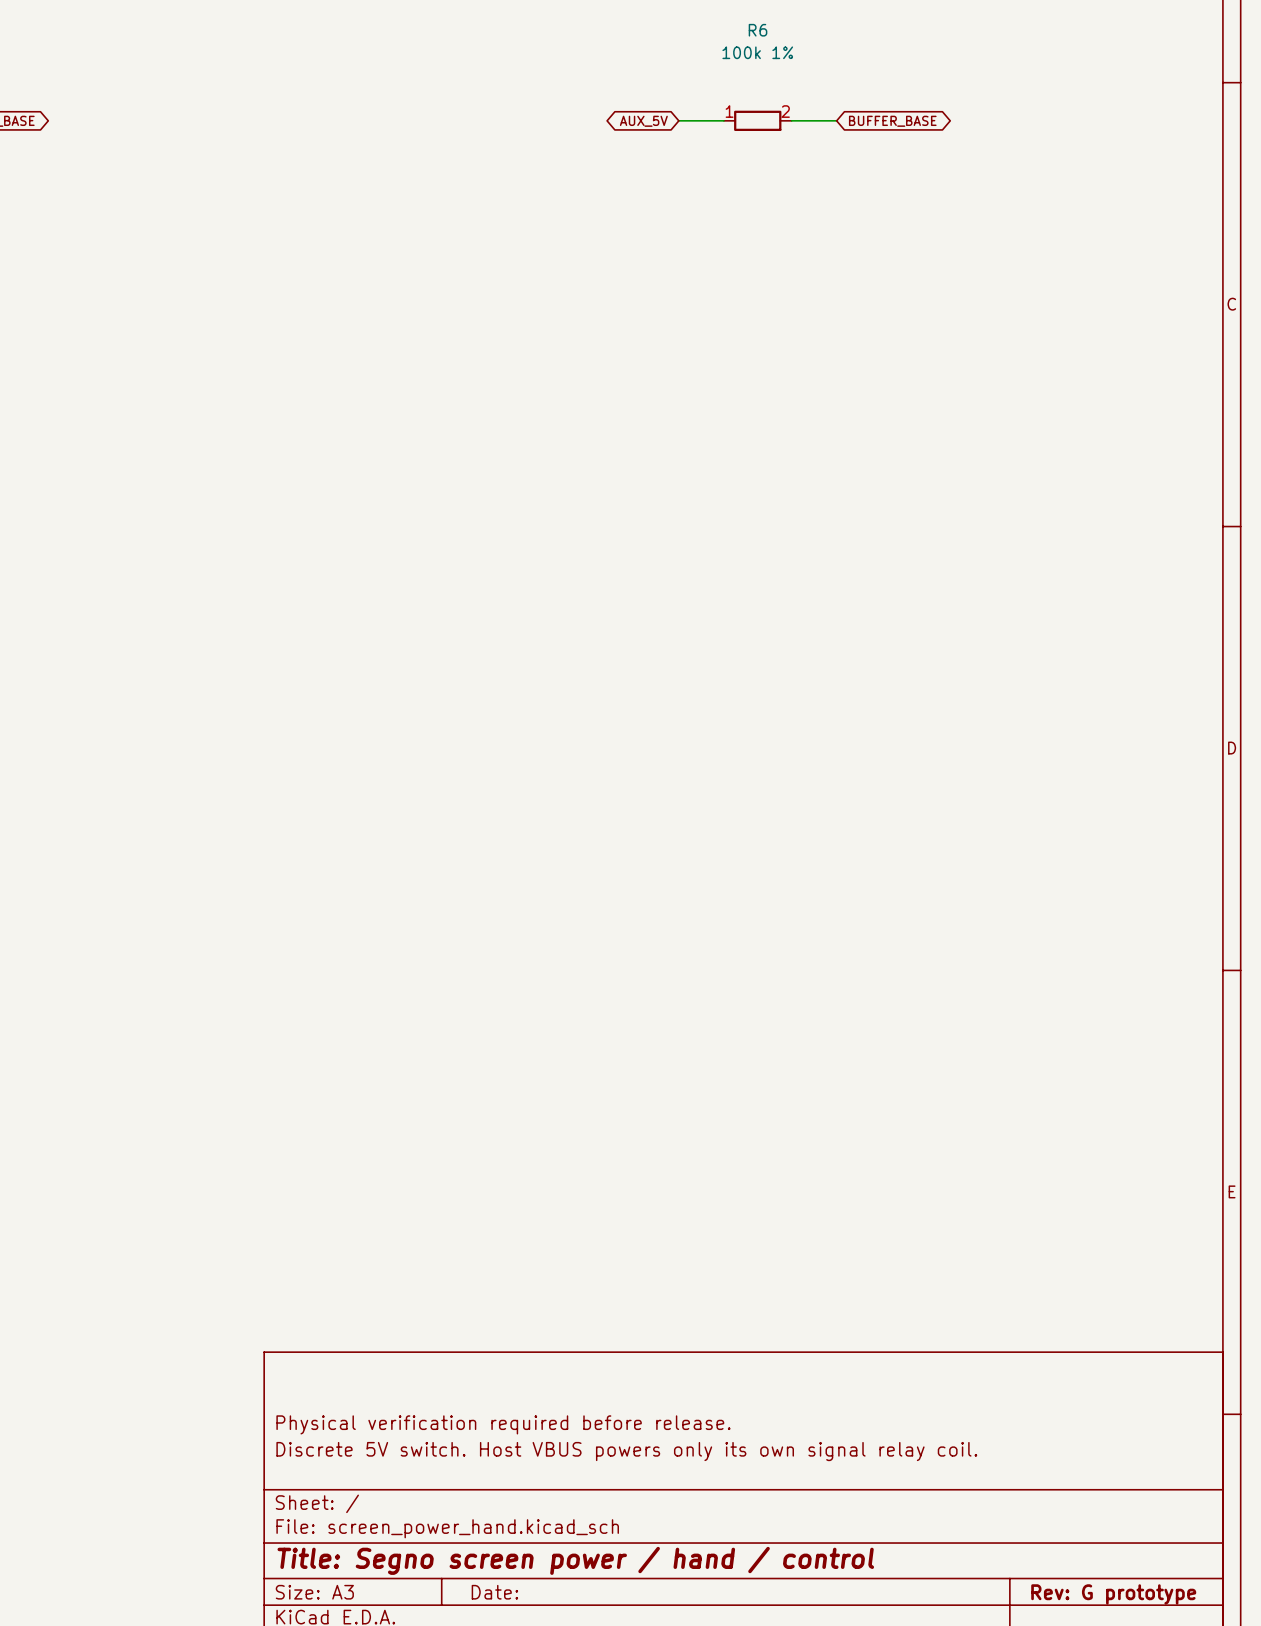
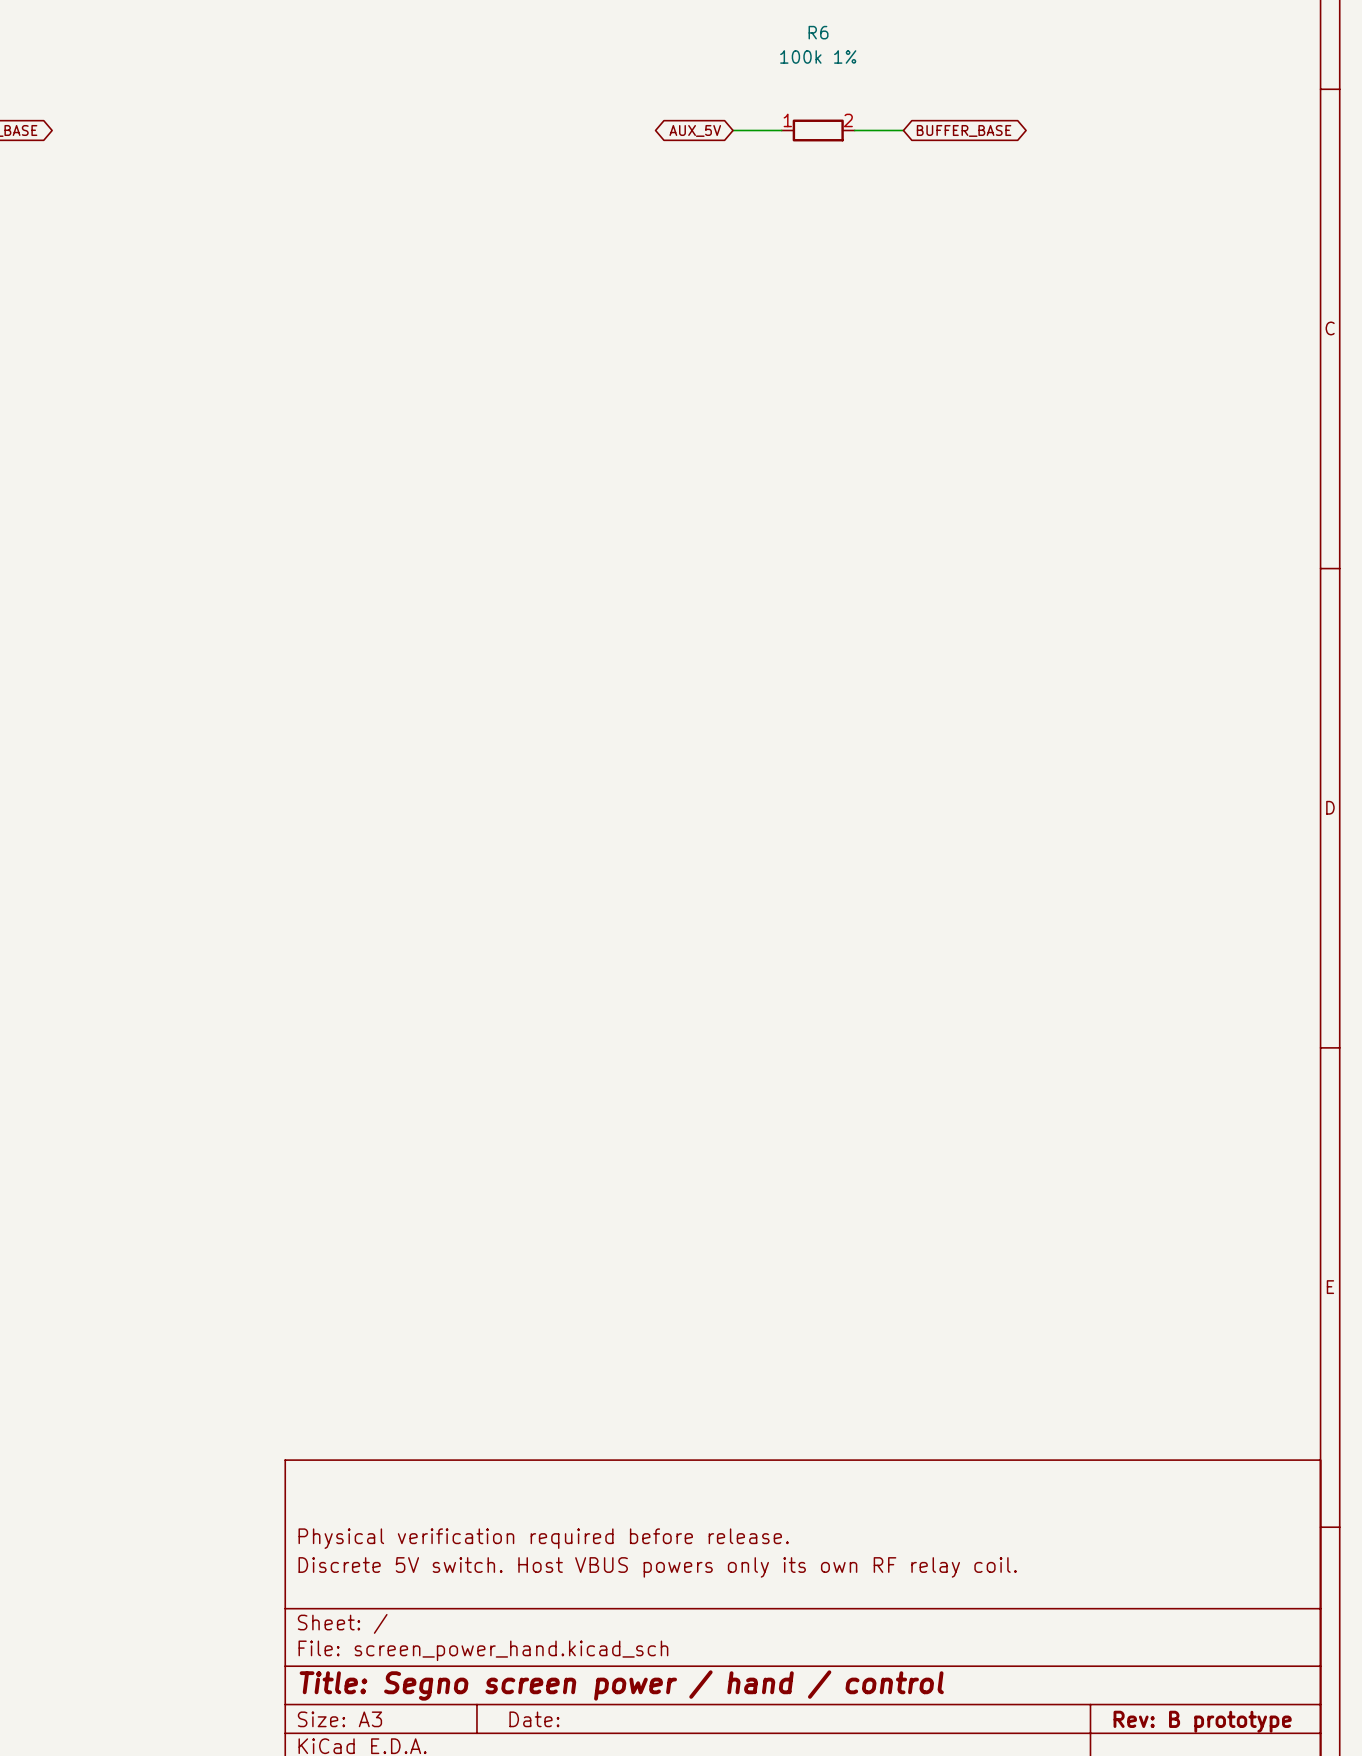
title block: Discrete 5V switch. Host VBUS powers only its own signal relay coil. (626, 1451) -> Discrete 5V switch. Host VBUS powers only its own RF relay coil. (657, 1567)
title block: Rev: G prototype (1113, 1594) -> Rev: B prototype (1202, 1721)

